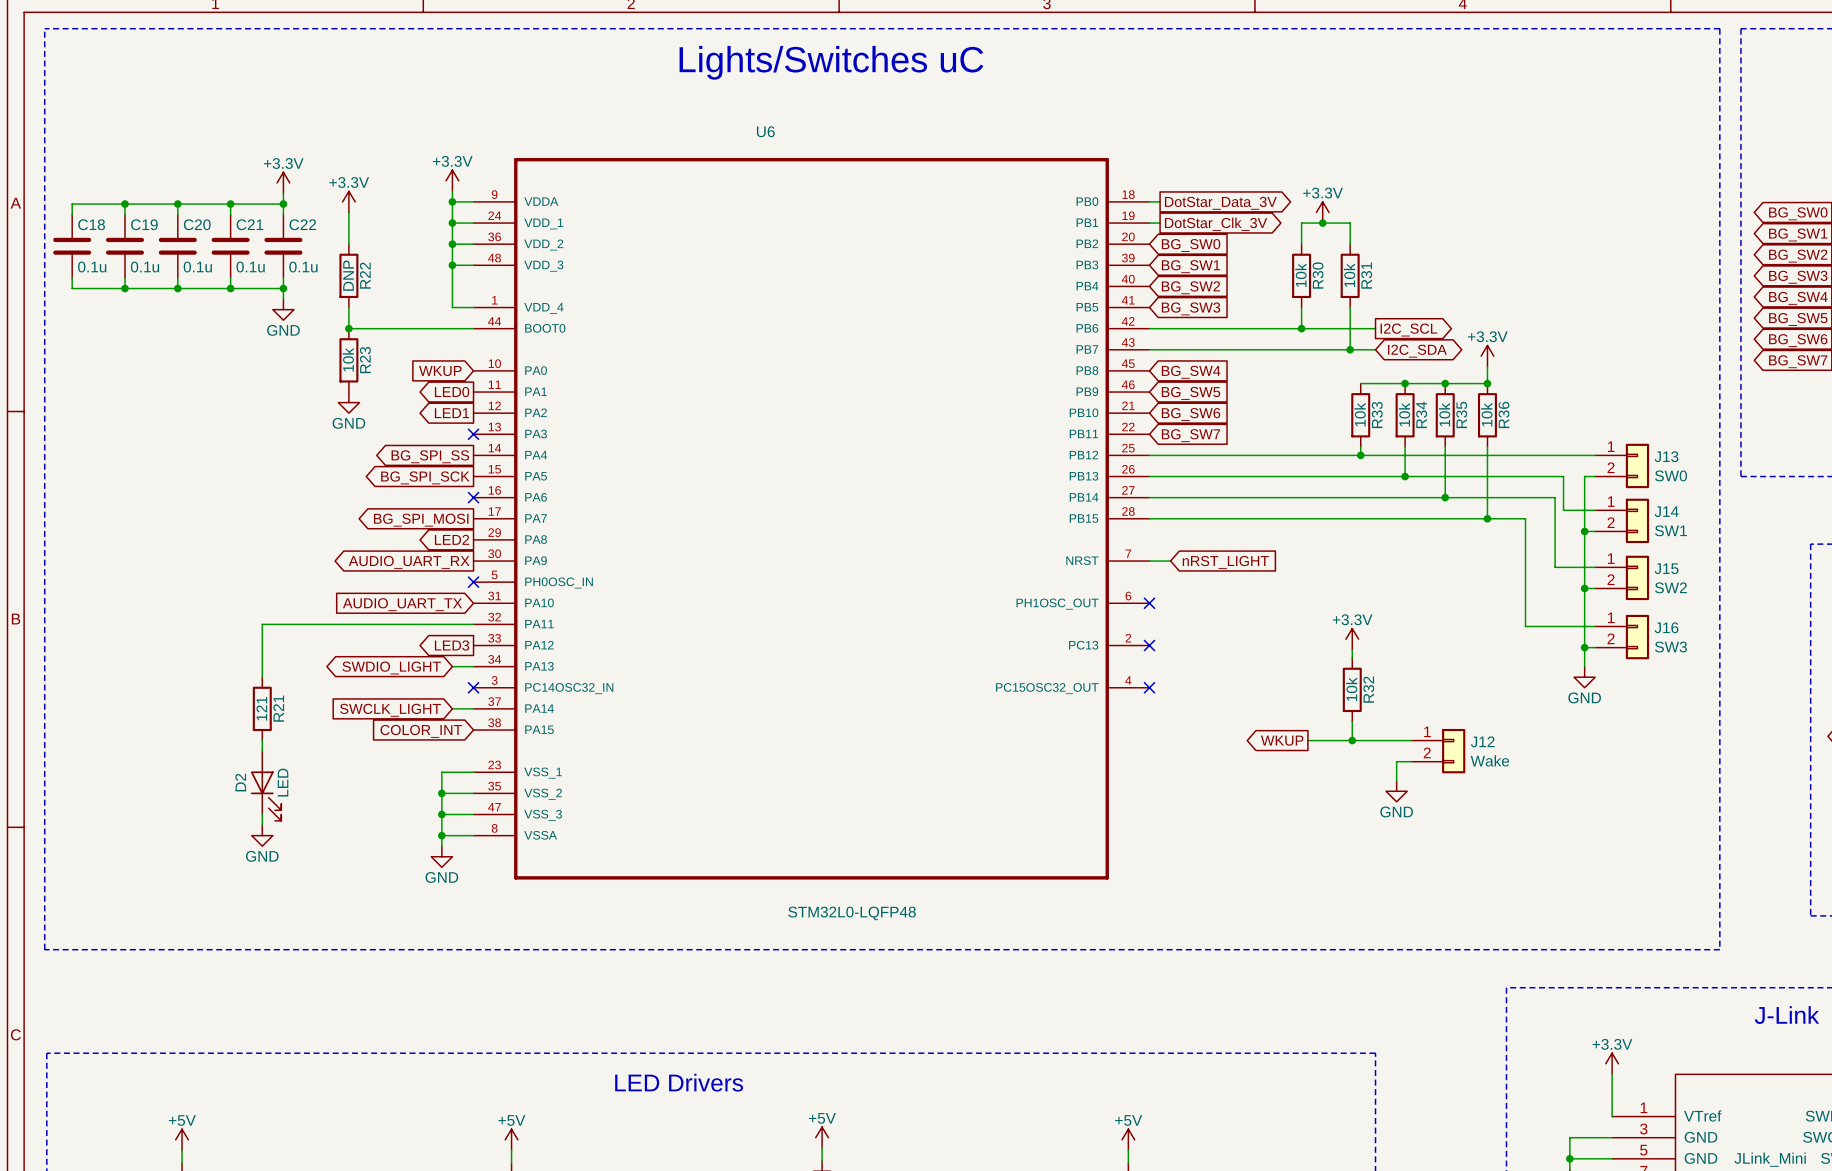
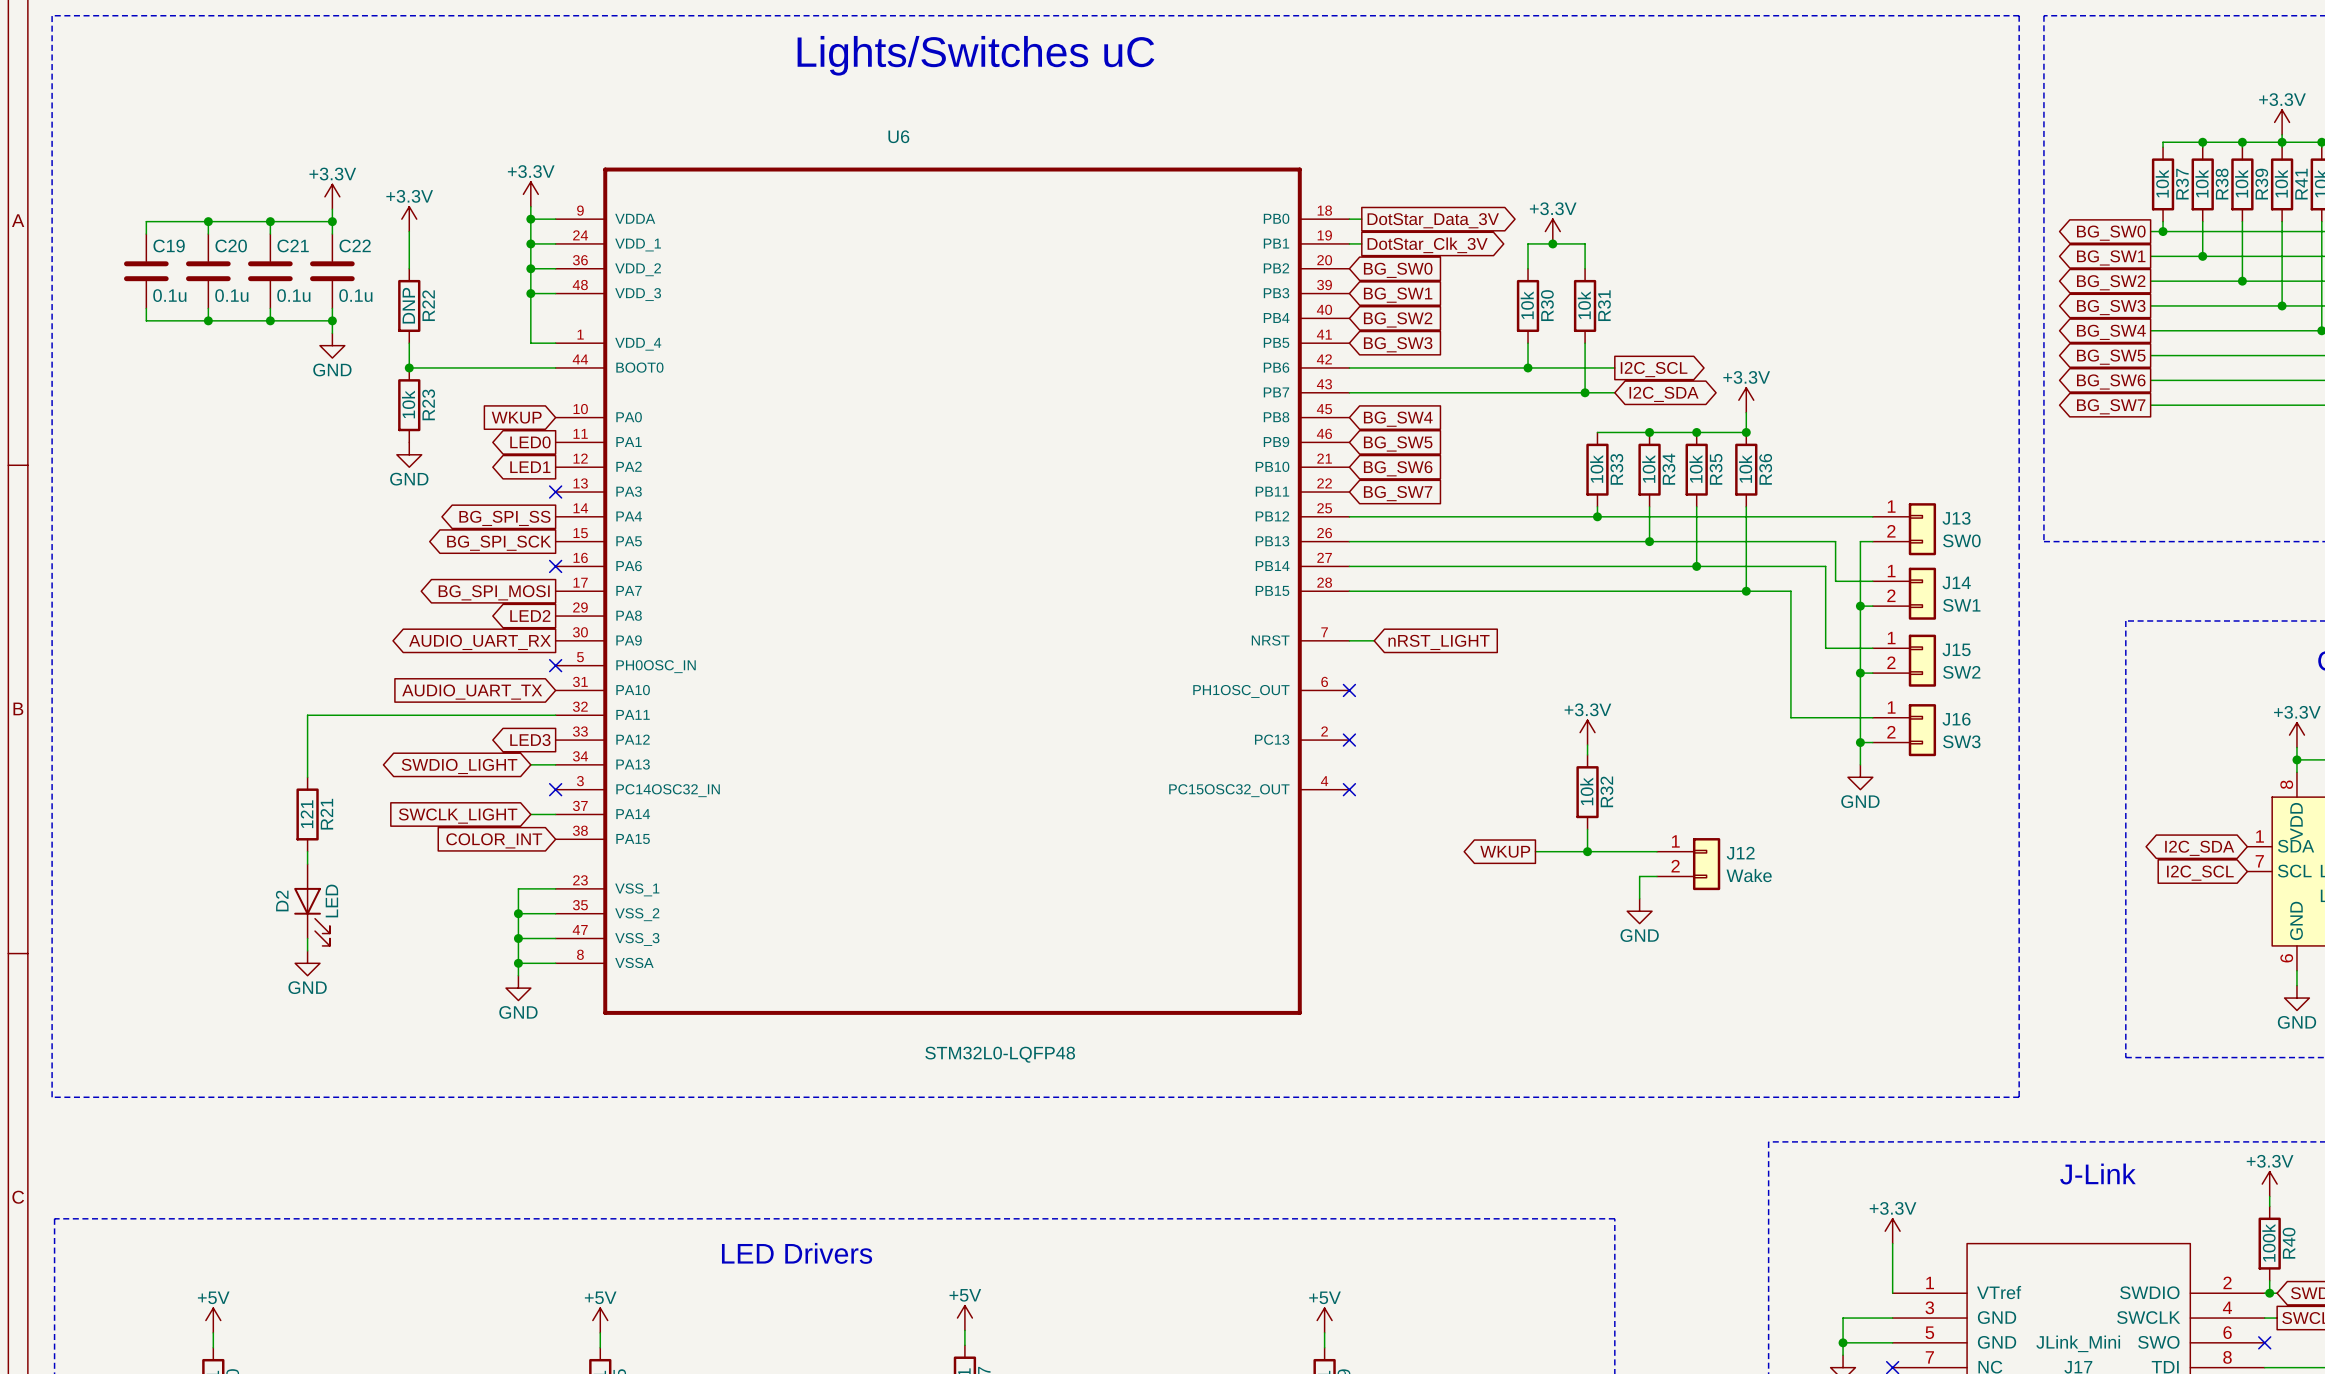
wire: (124, 204) (72, 204) (72, 214) -> none
junction: (124, 204) -> none
C18: 0.1u (72, 246) -> none
wire: (72, 277) (72, 288) (124, 288) -> none
junction: (124, 288) -> none

